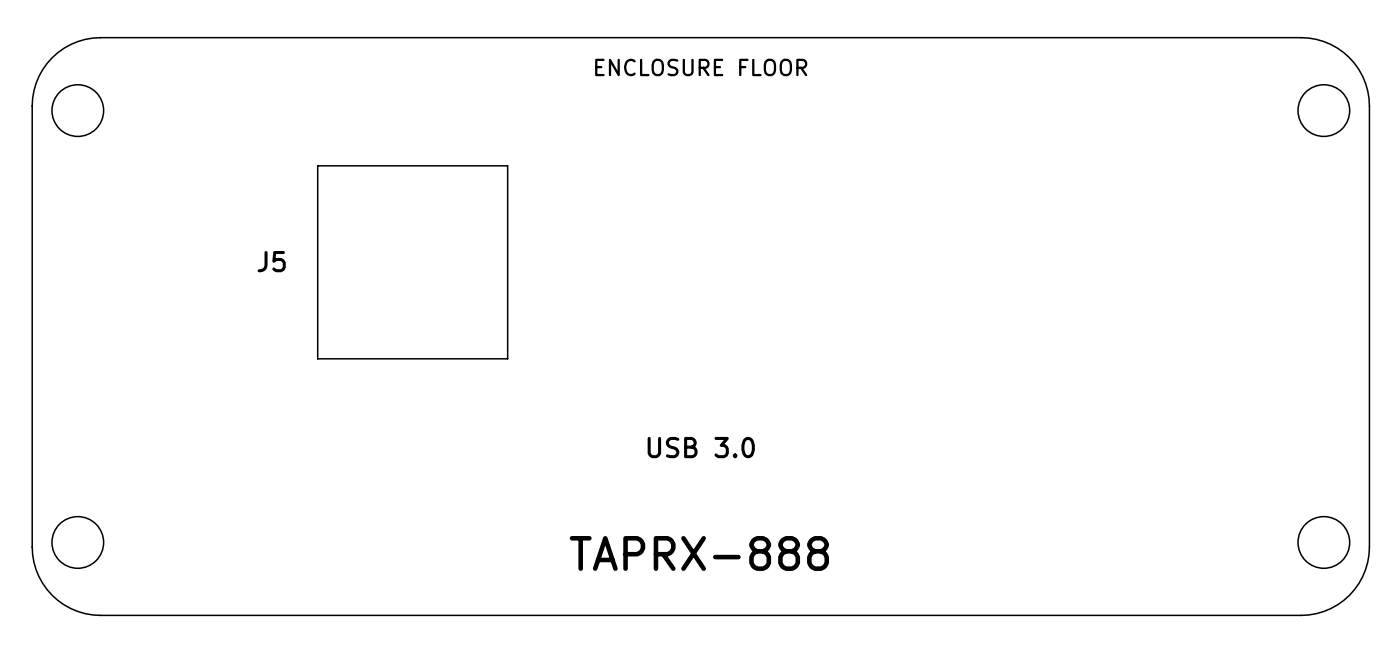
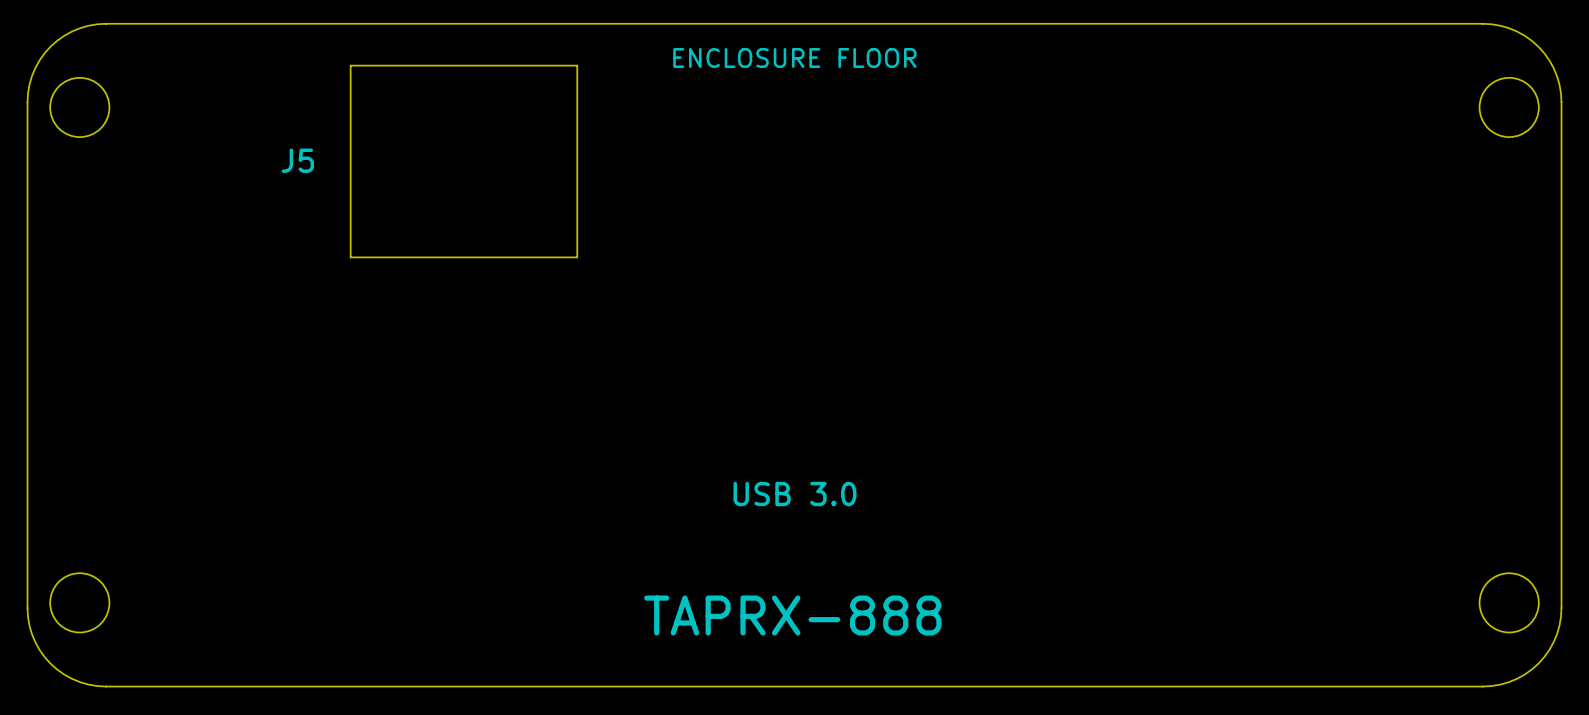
board edge: none -> (350, 65) (577, 65) (577, 257) (350, 257) (350, 65)
board edge: (317, 165) (507, 165) (507, 358) (317, 358) (317, 165) -> none
text position: J5 (271, 261) -> J5 (297, 160)

